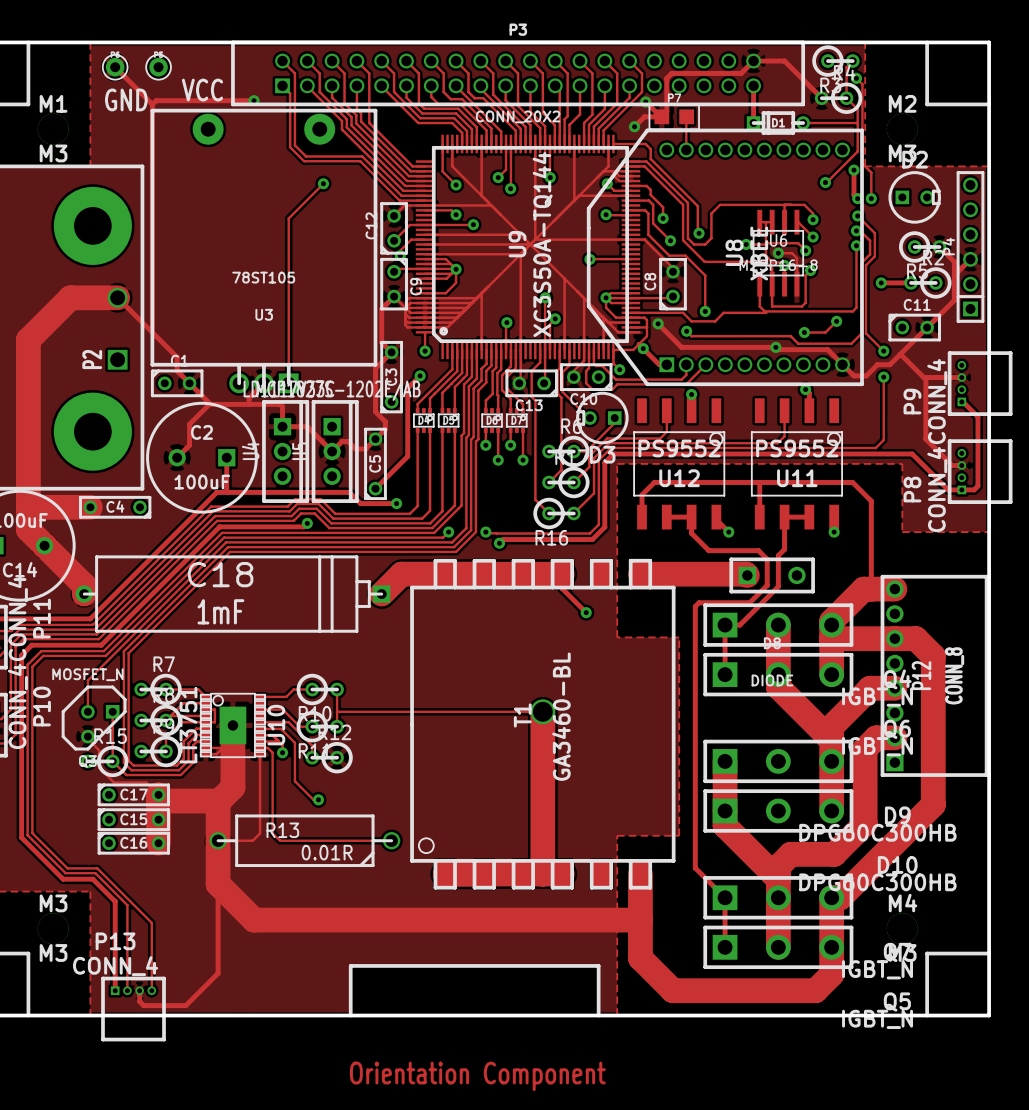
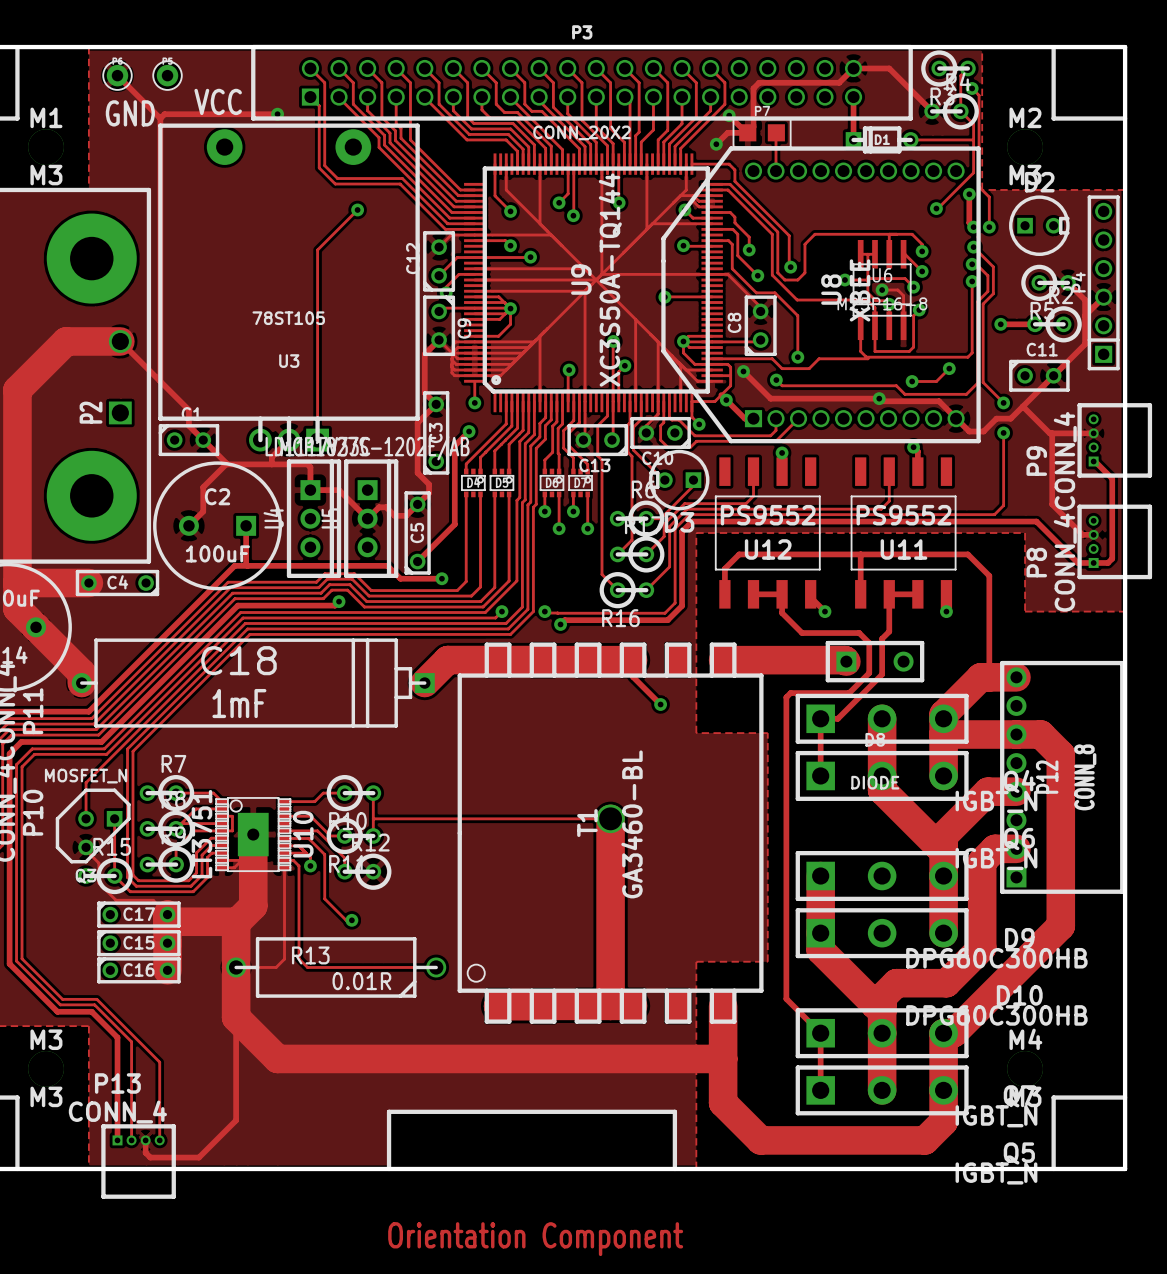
U12 footprint: [633, 398, 725, 530] -> [715, 457, 821, 609]
U11 footprint: [751, 398, 843, 530] -> [850, 457, 957, 609]

